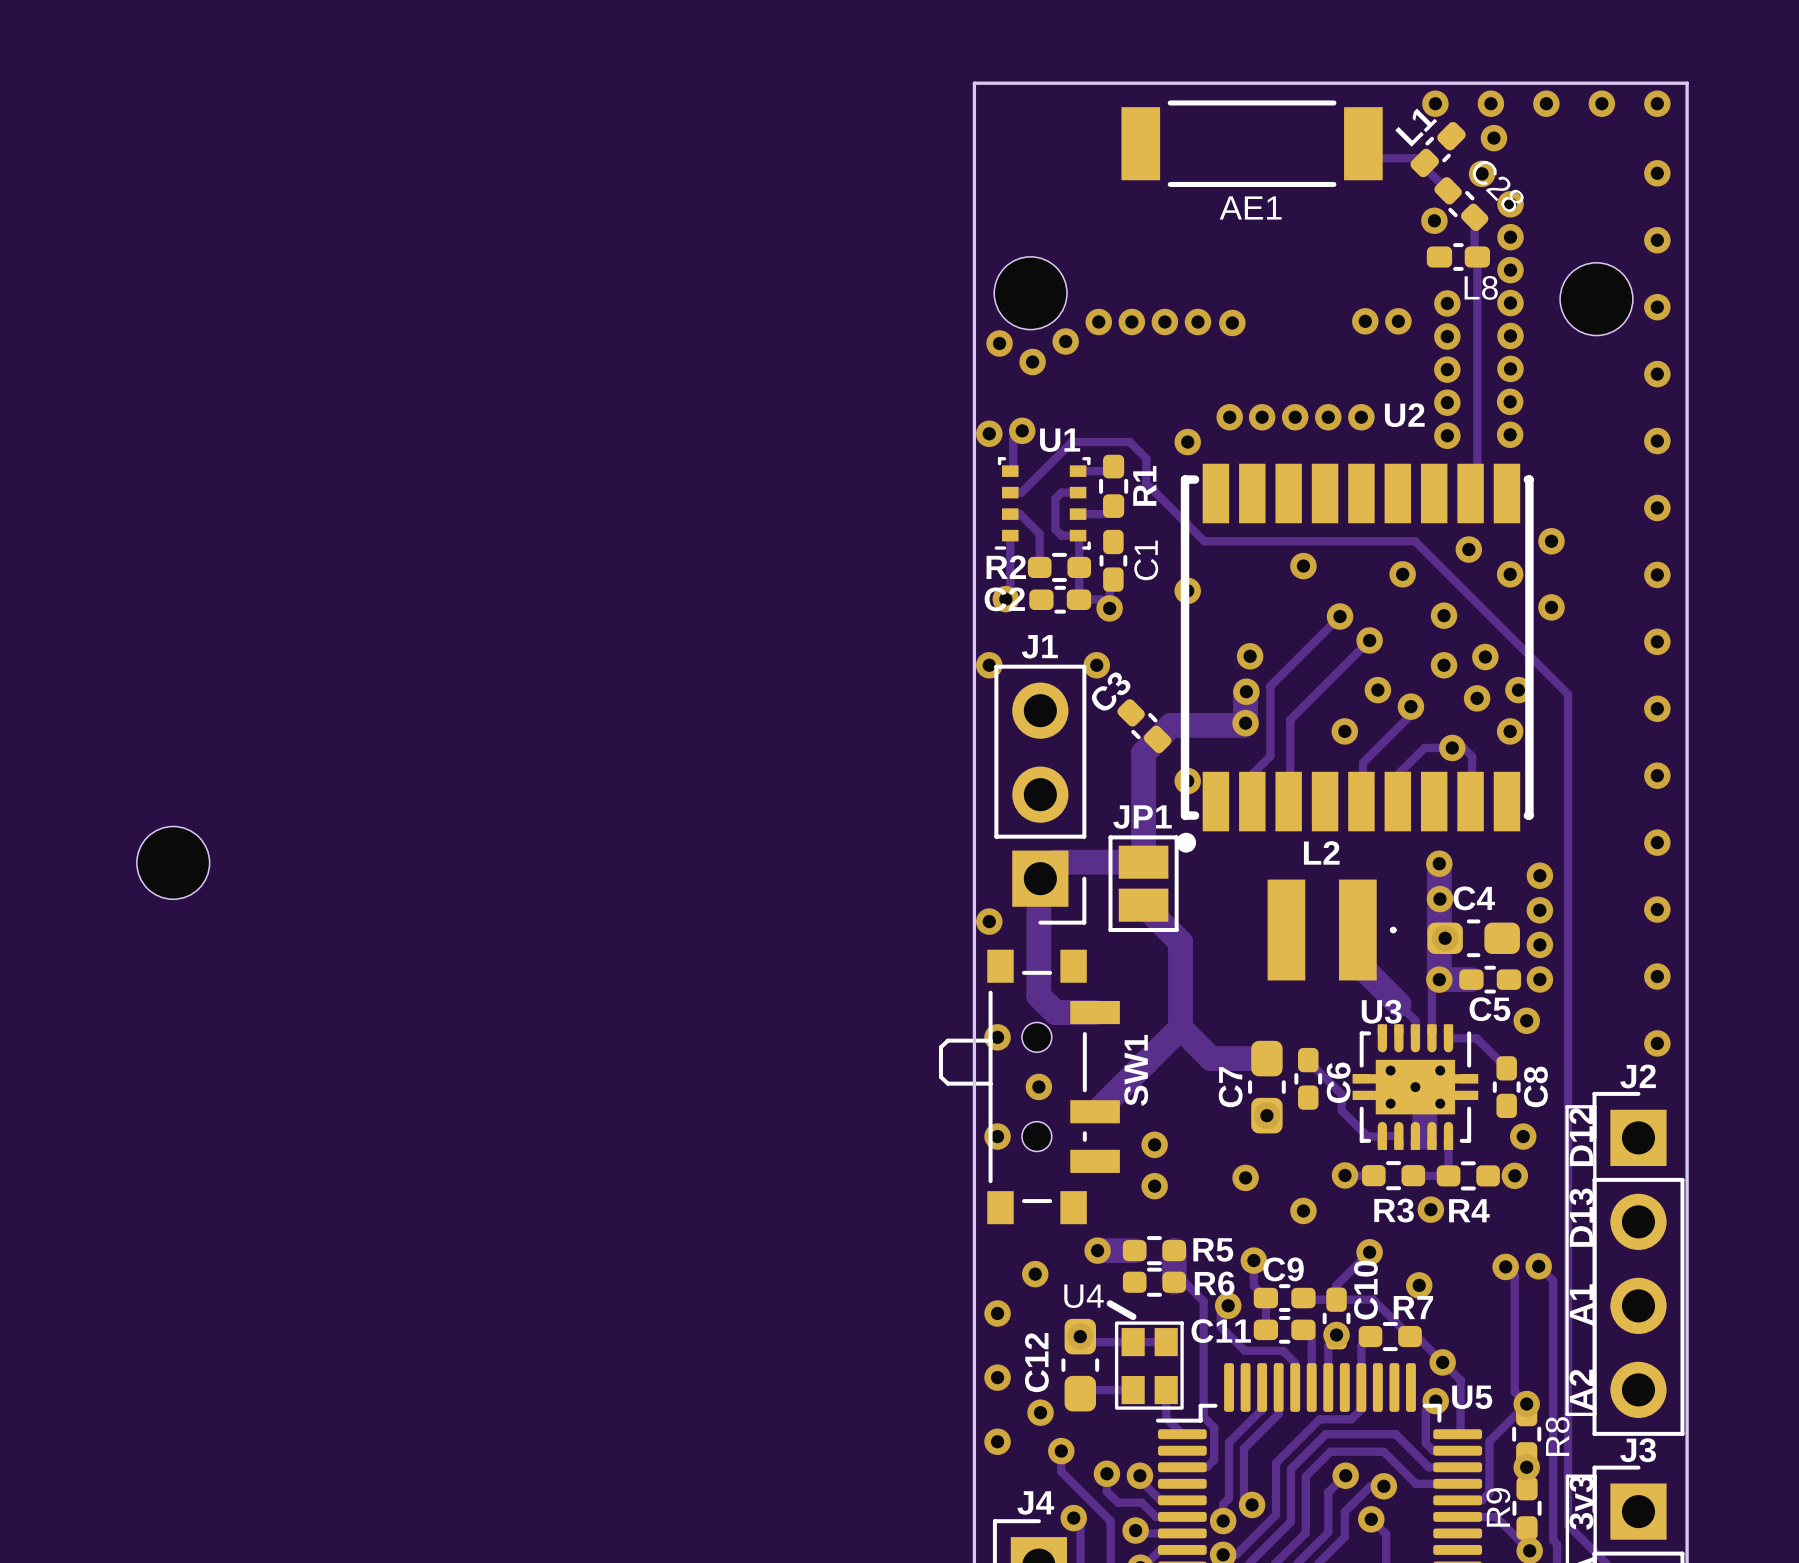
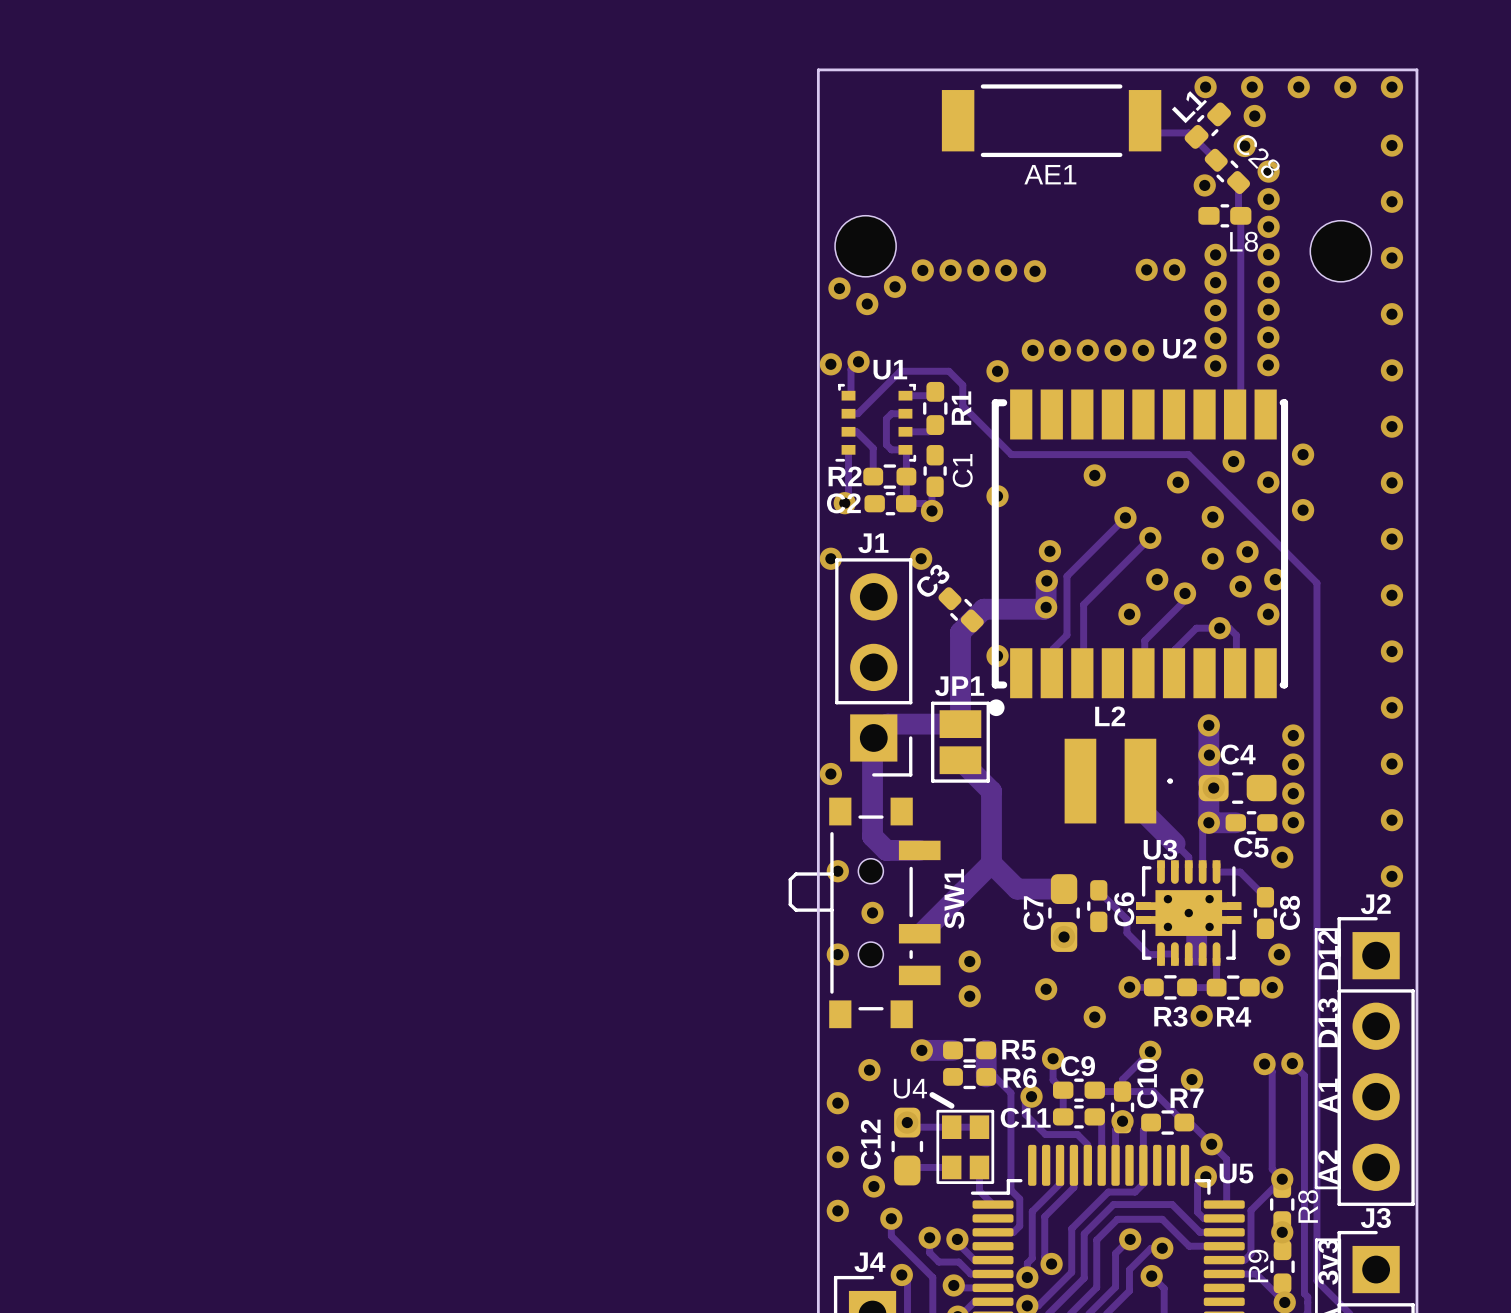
part: (173, 862) -> none

